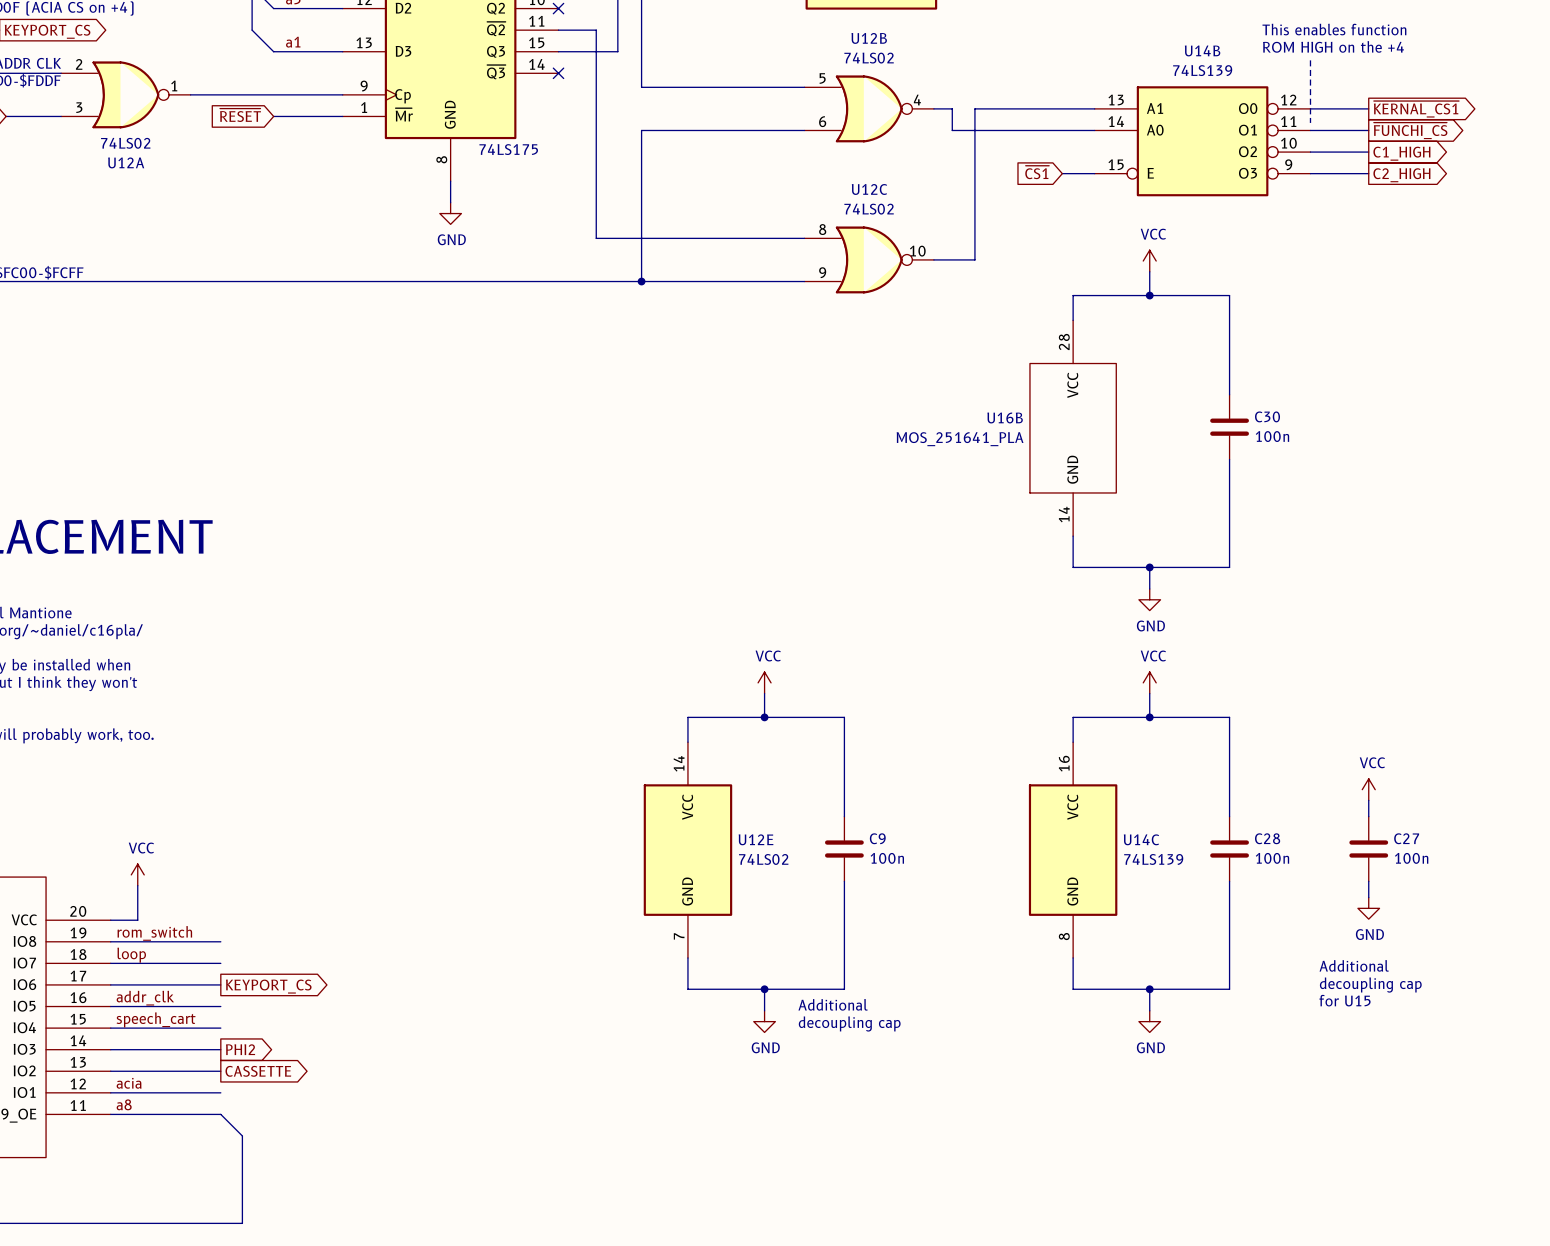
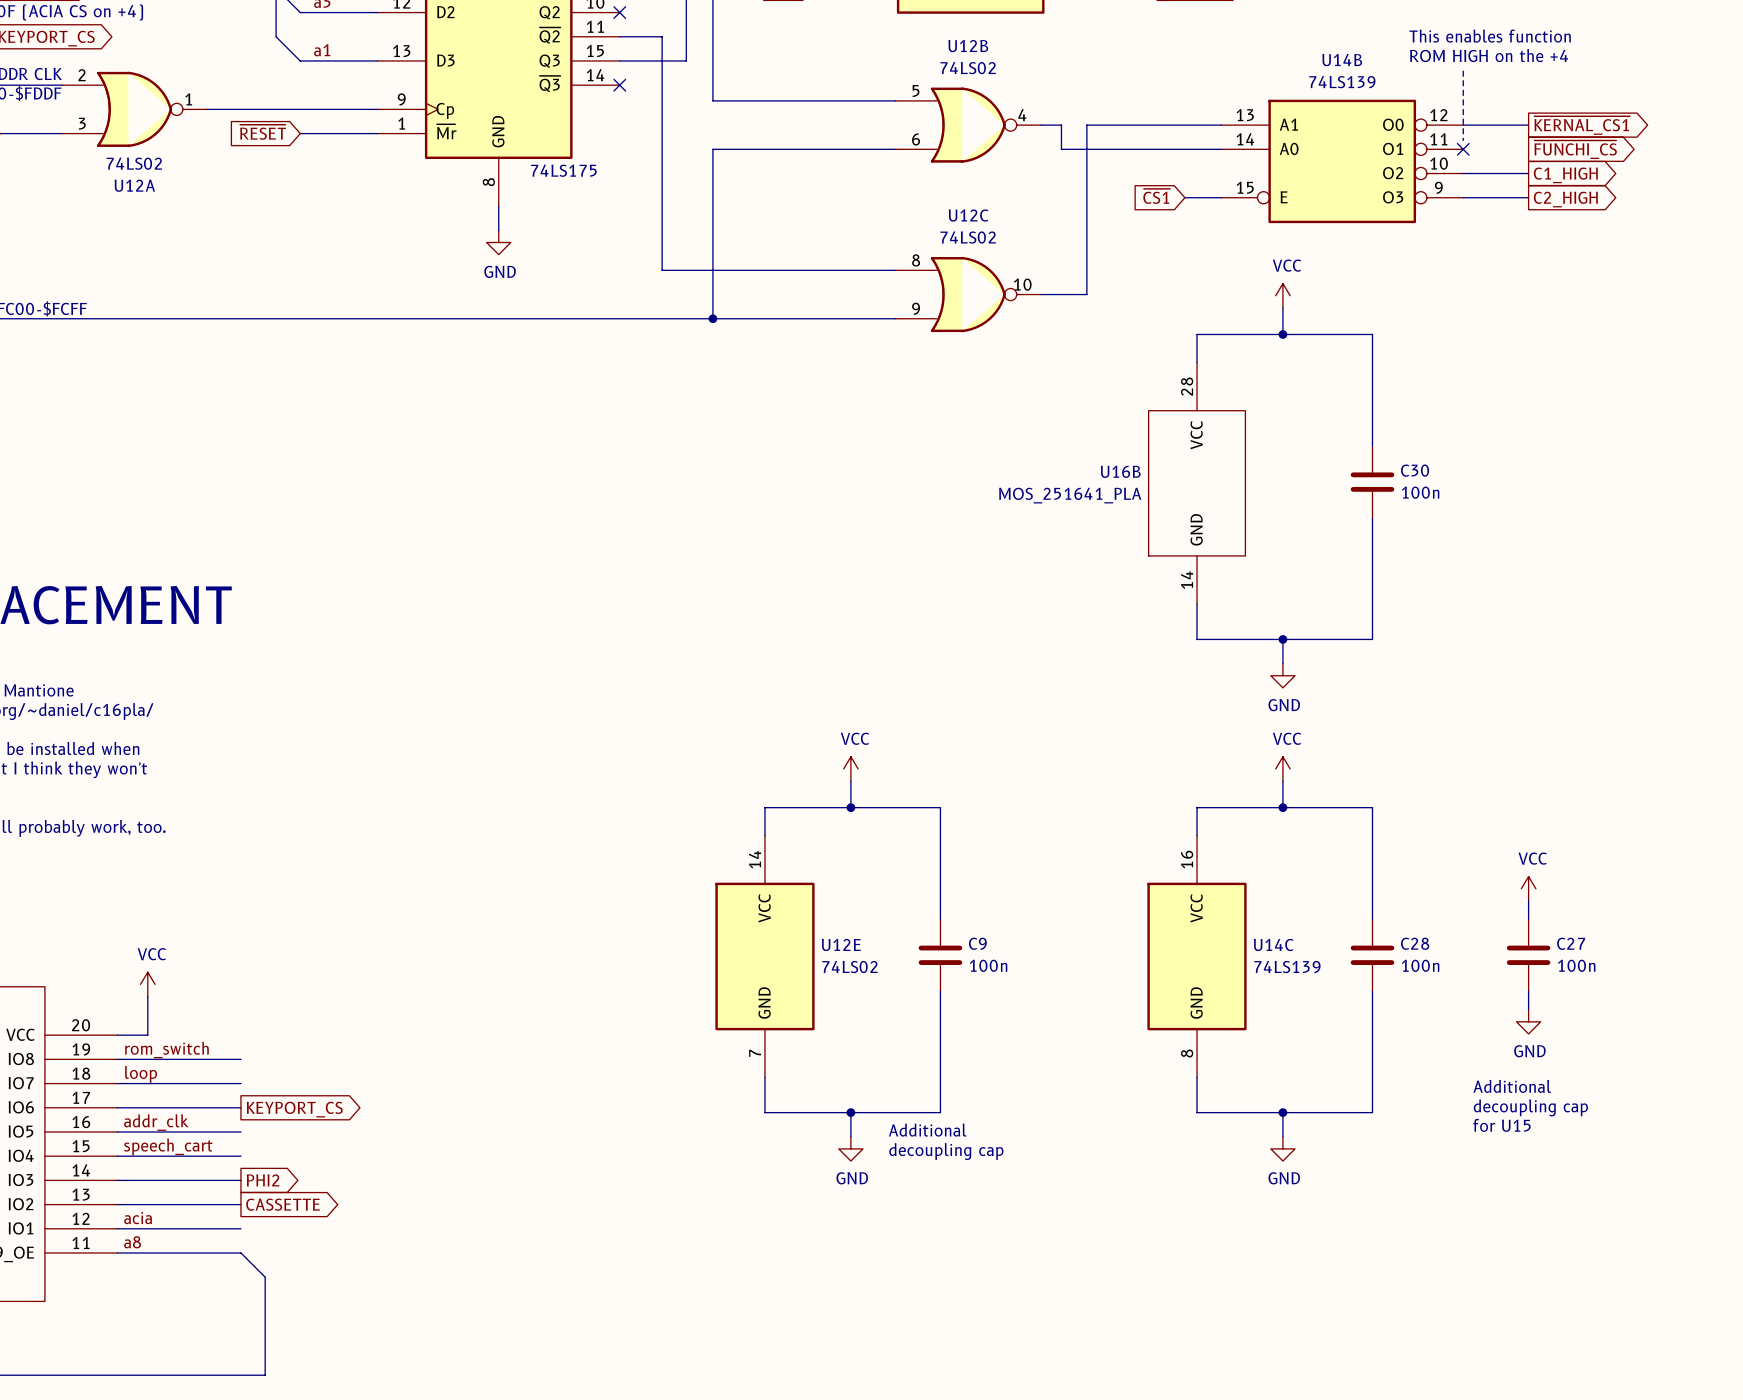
wire: (1310, 130) (1368, 130) -> none
no-connect mark: none -> (1463, 149)

